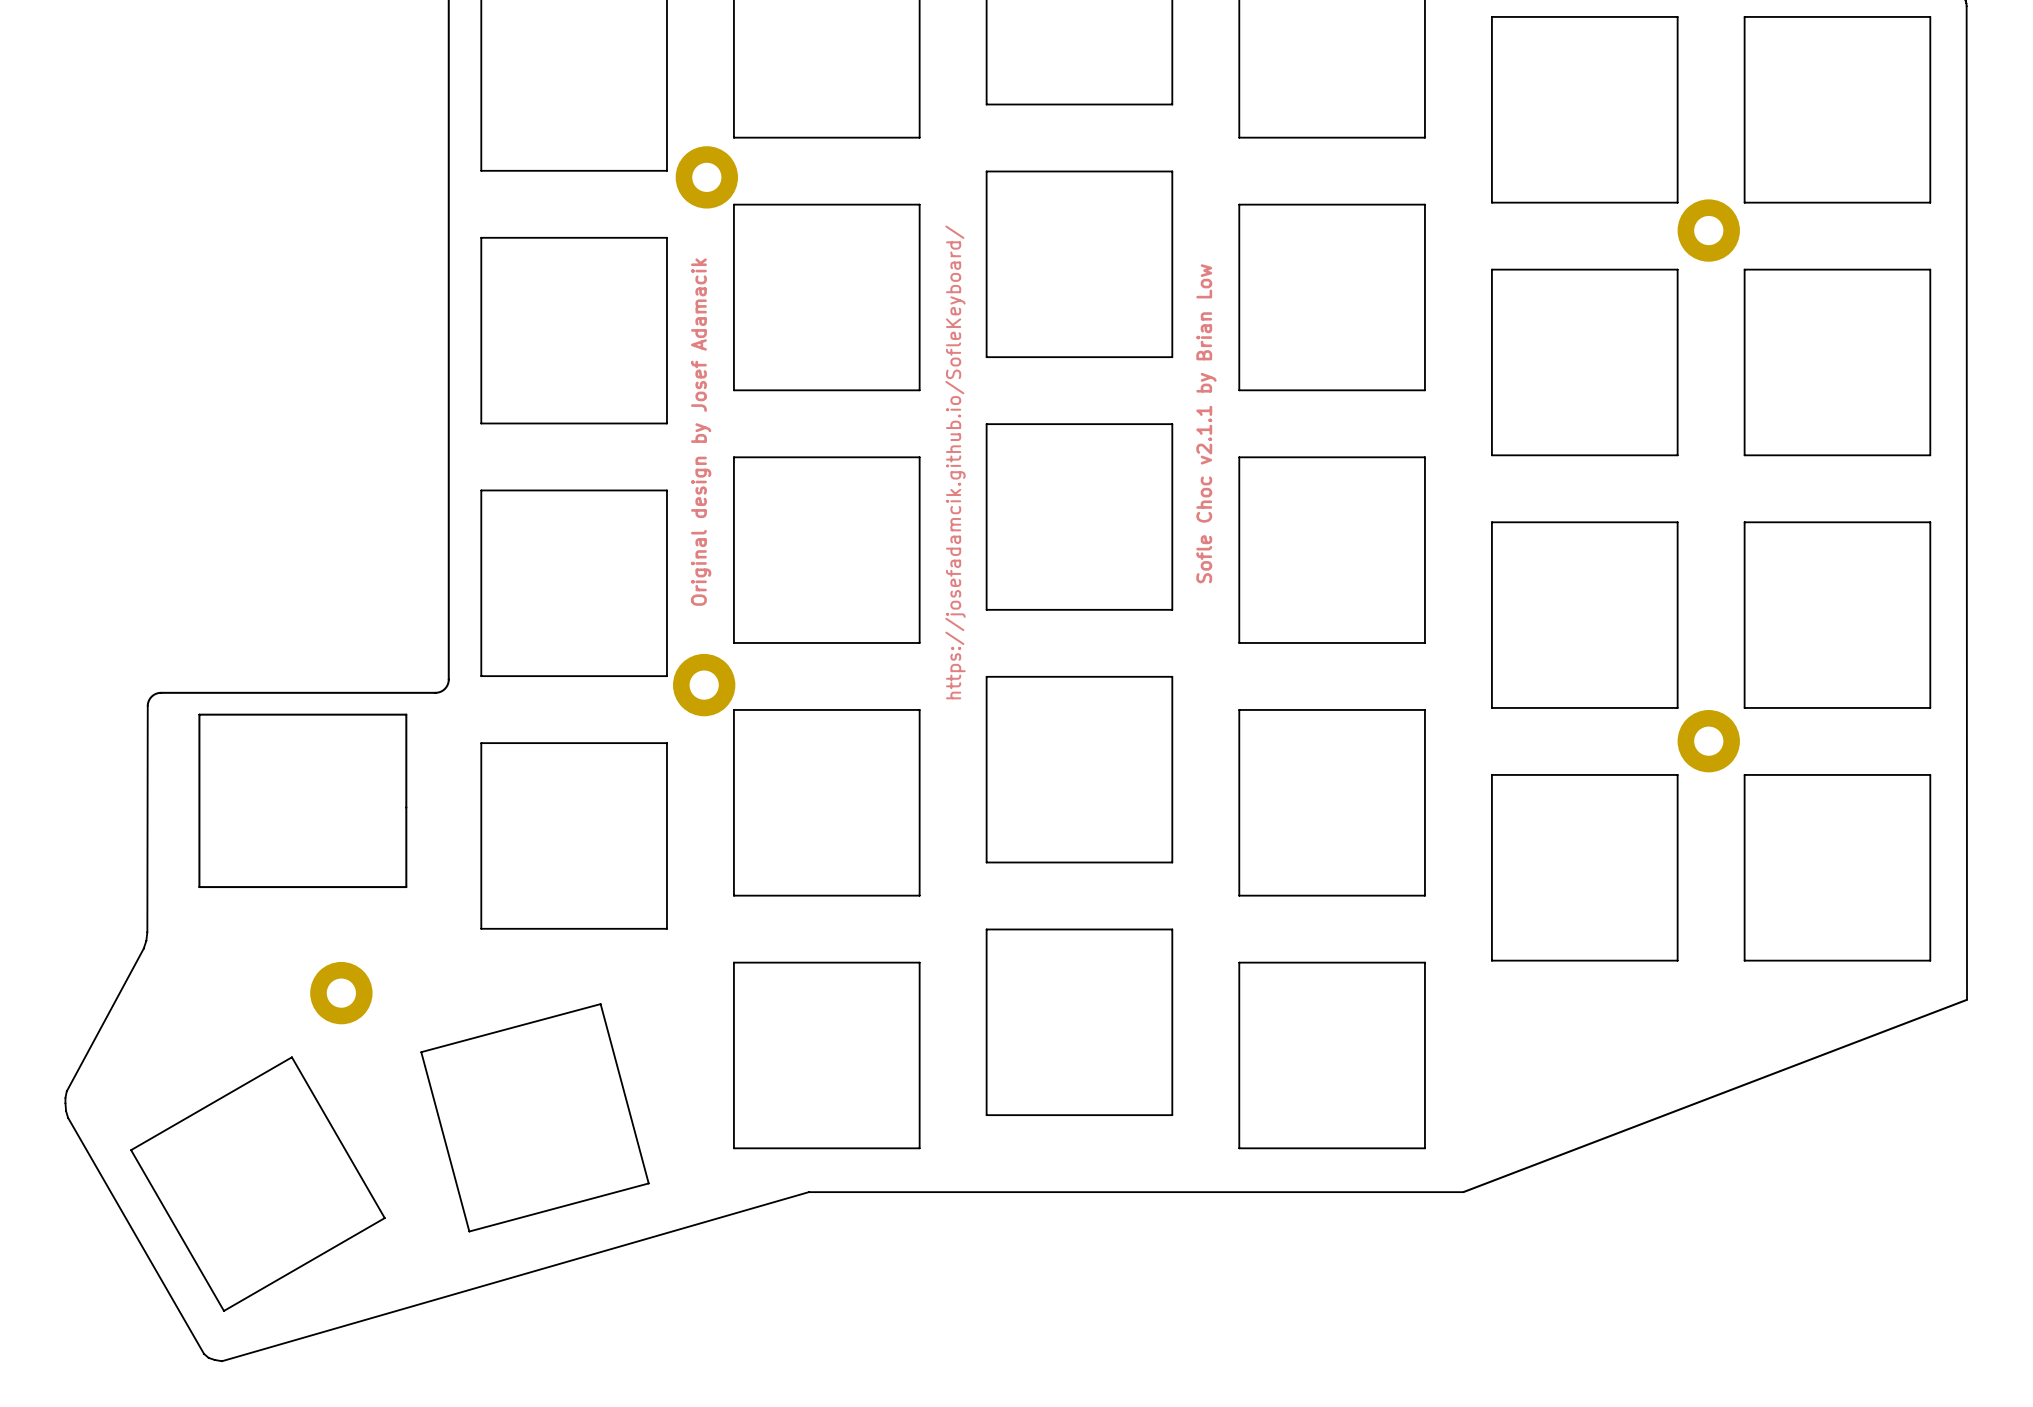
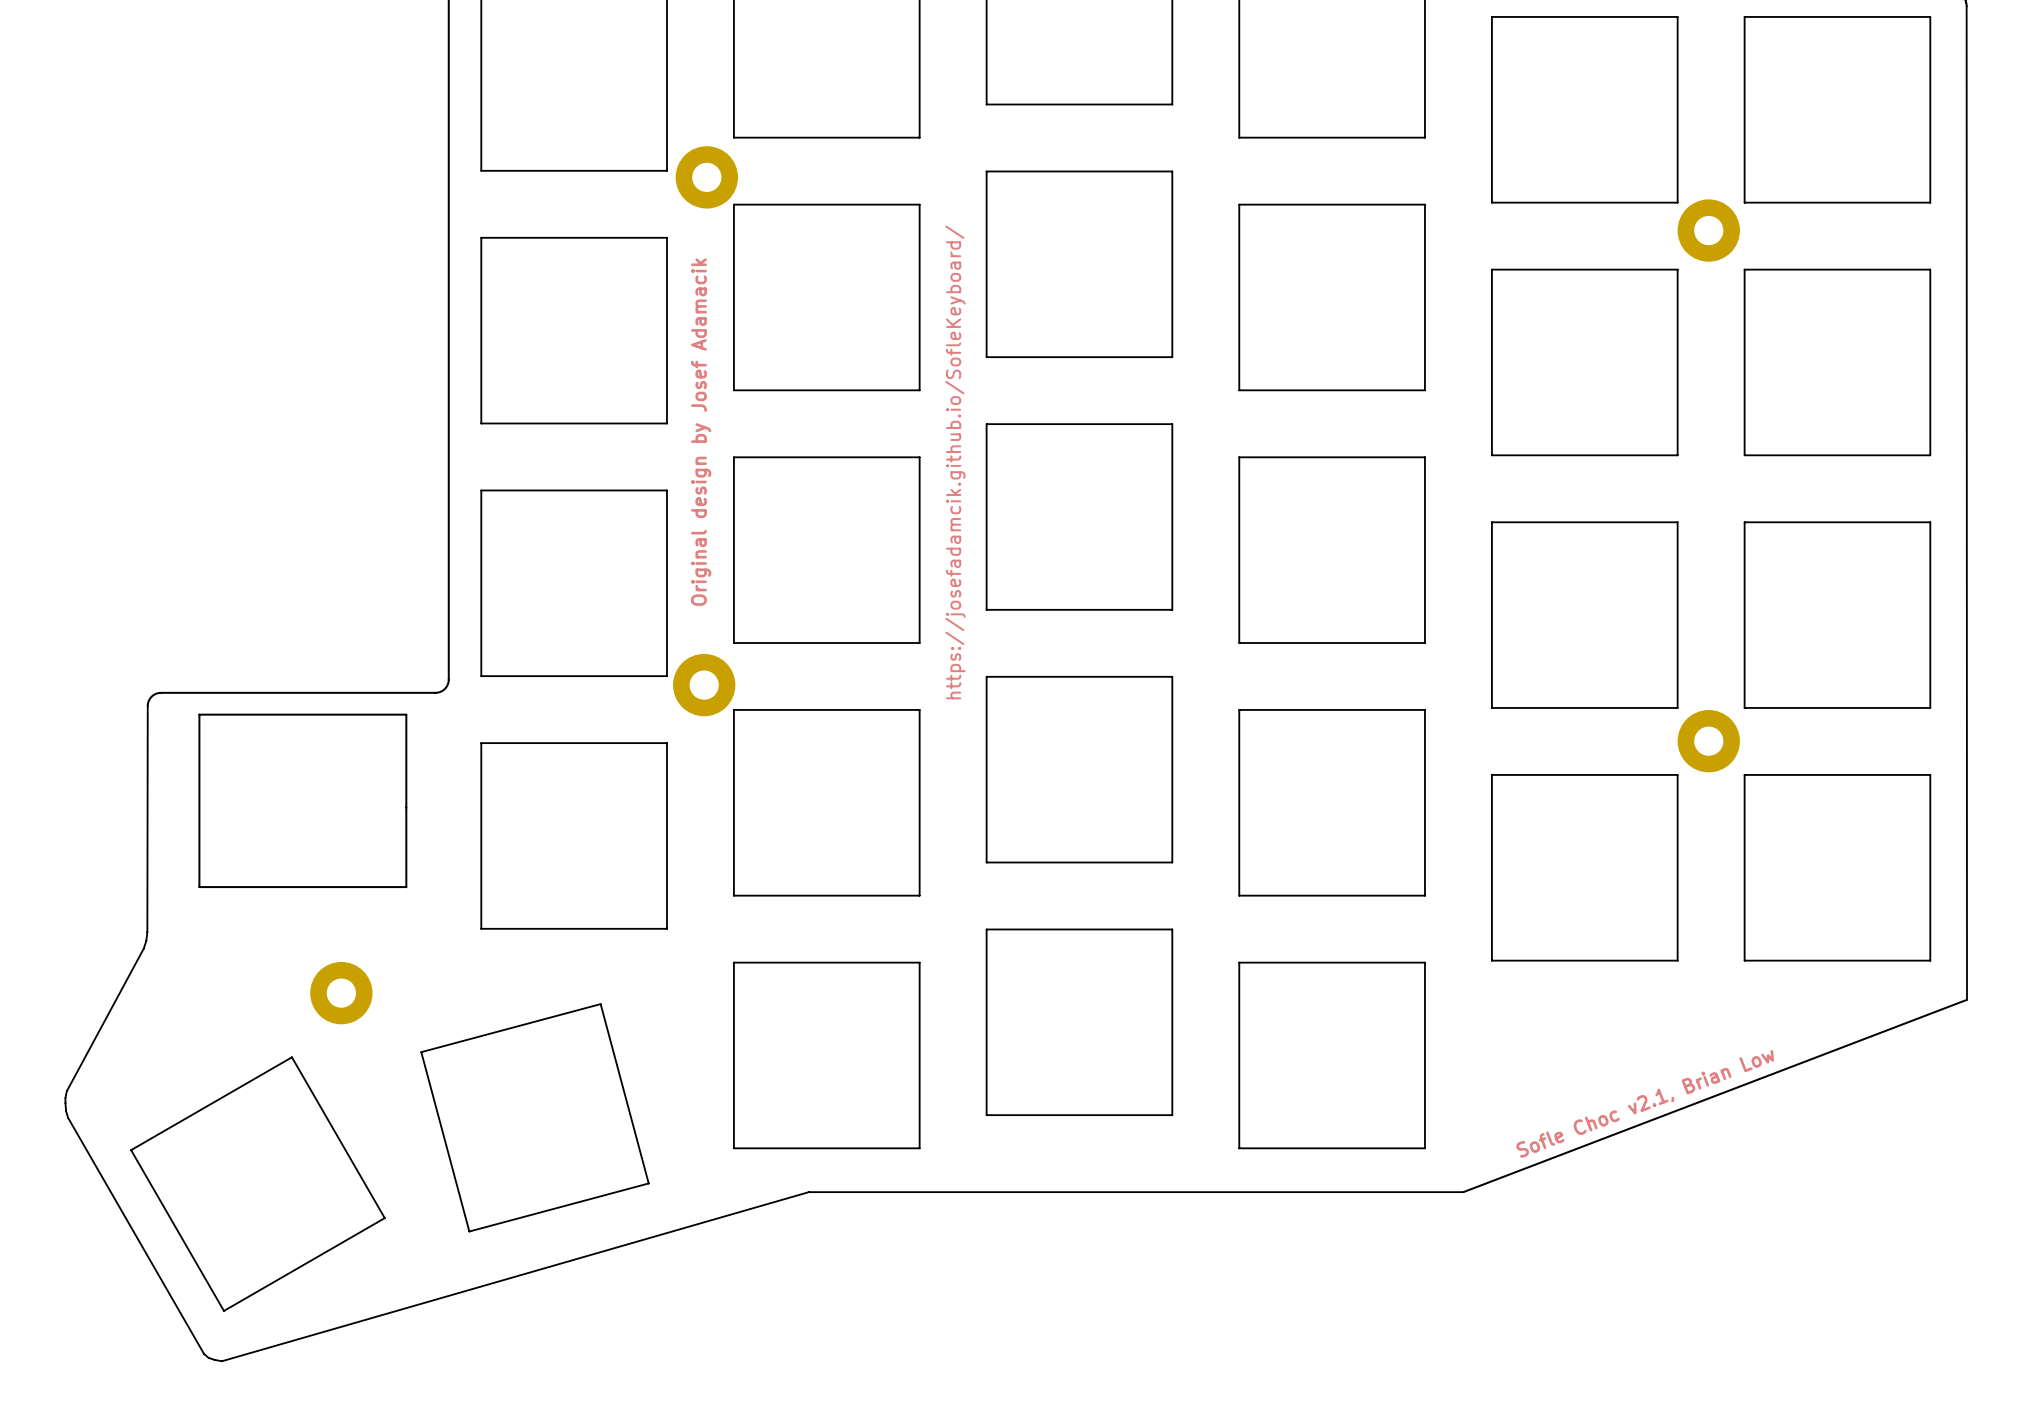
text: Sofle Choc v2.1.1 by Brian Low (1206, 423) -> none
text: none -> Sofle Choc v2.1, Brian Low (1645, 1103)

